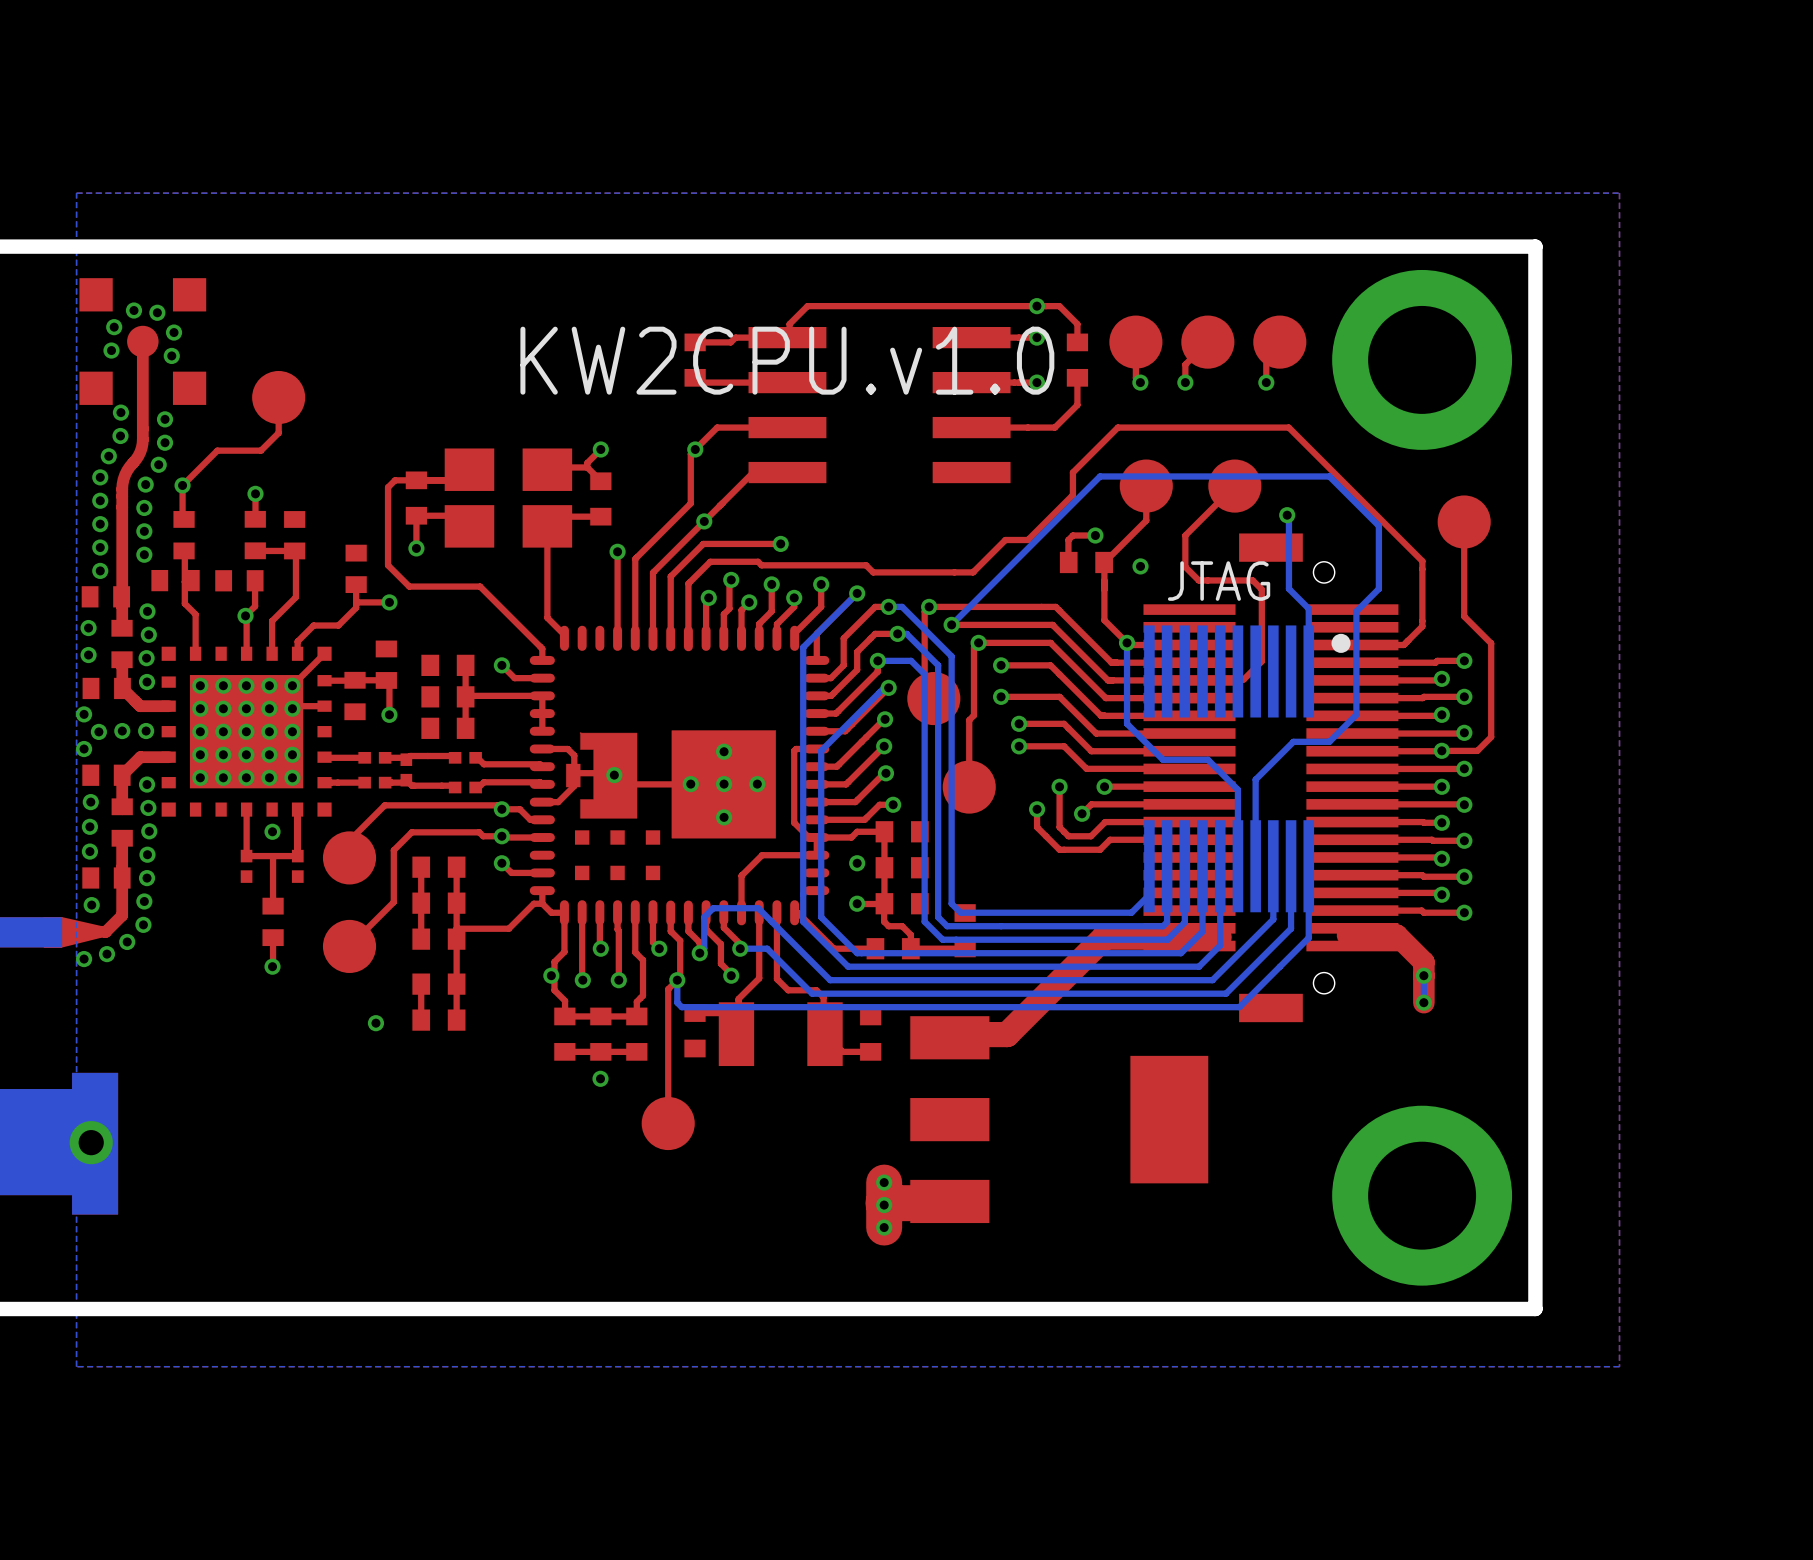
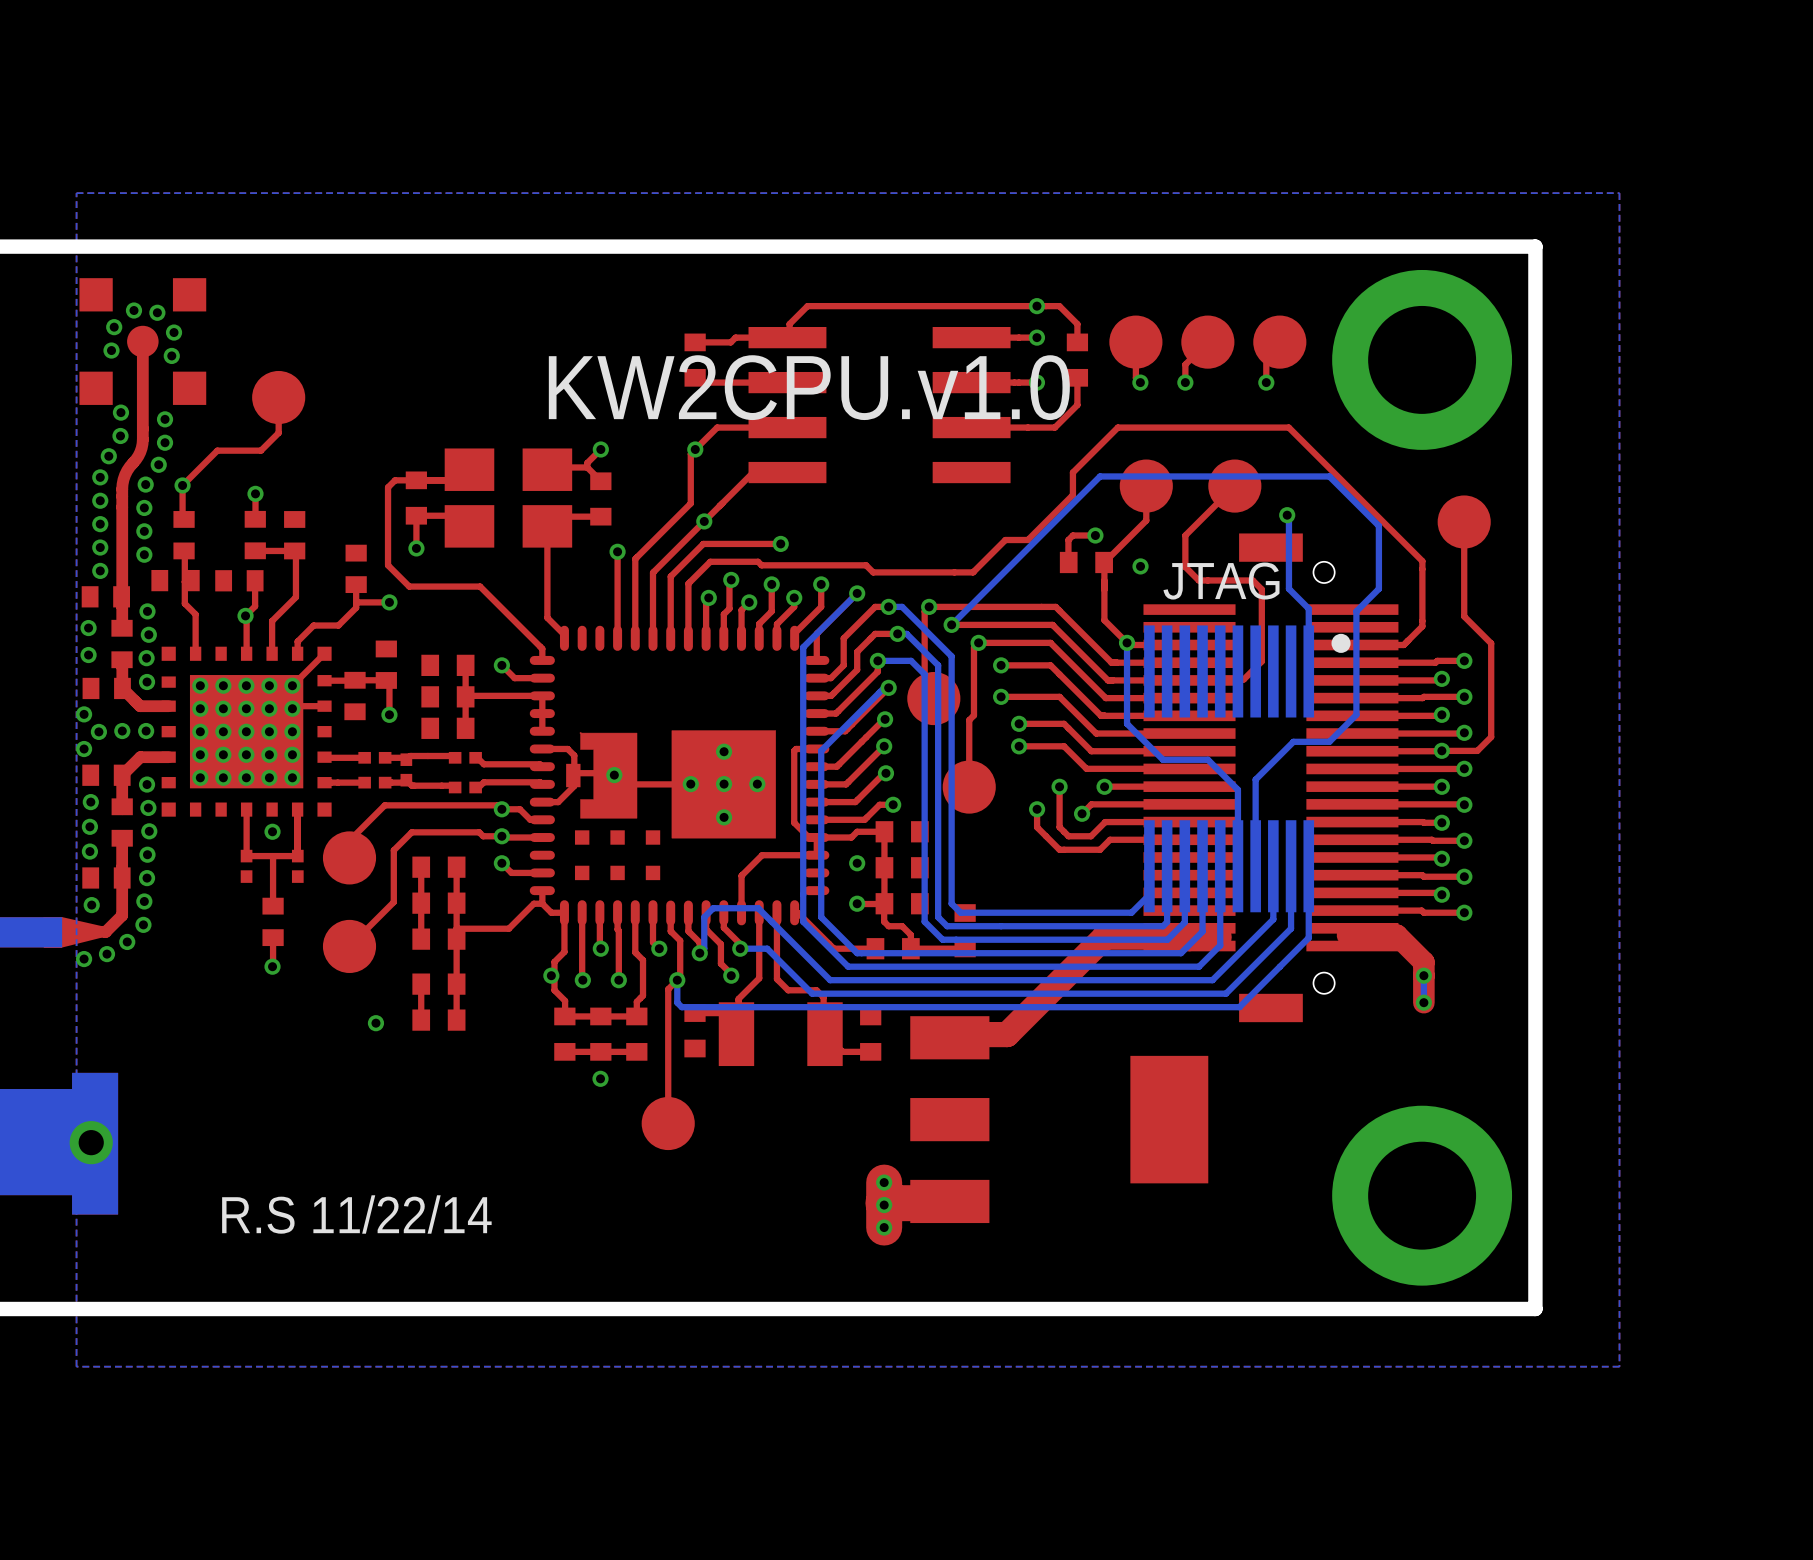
text position: KW2CPU.v1.0 (787, 360) -> KW2CPU.v1.0 (809, 387)
text: none -> R.S 11/22/14 (356, 1214)

